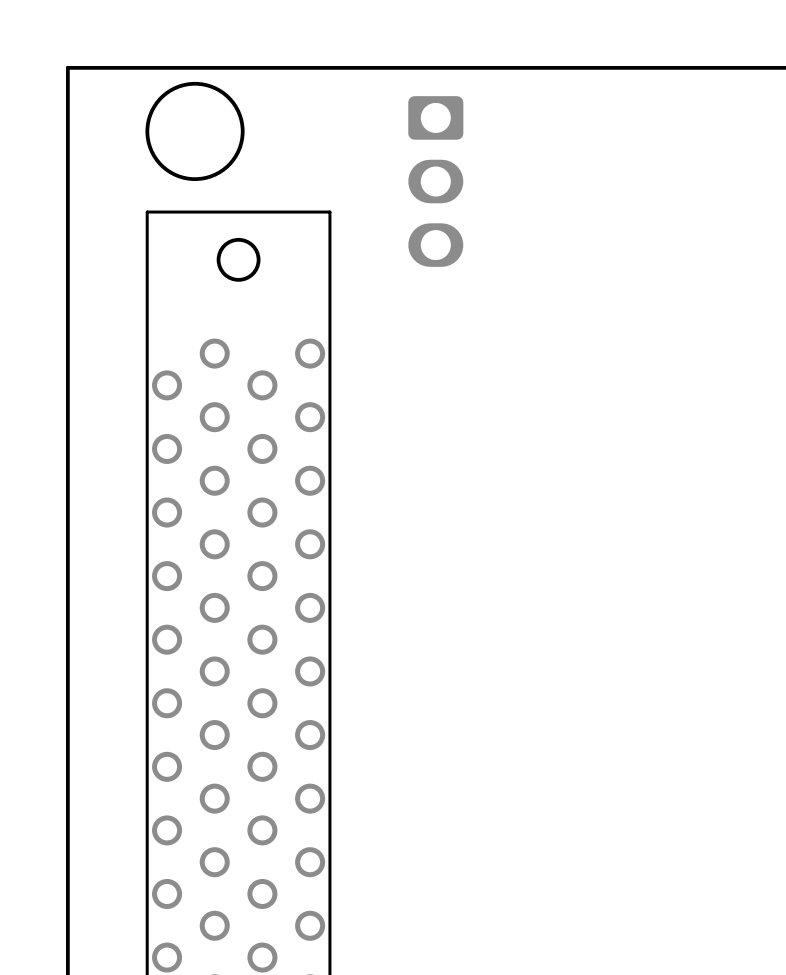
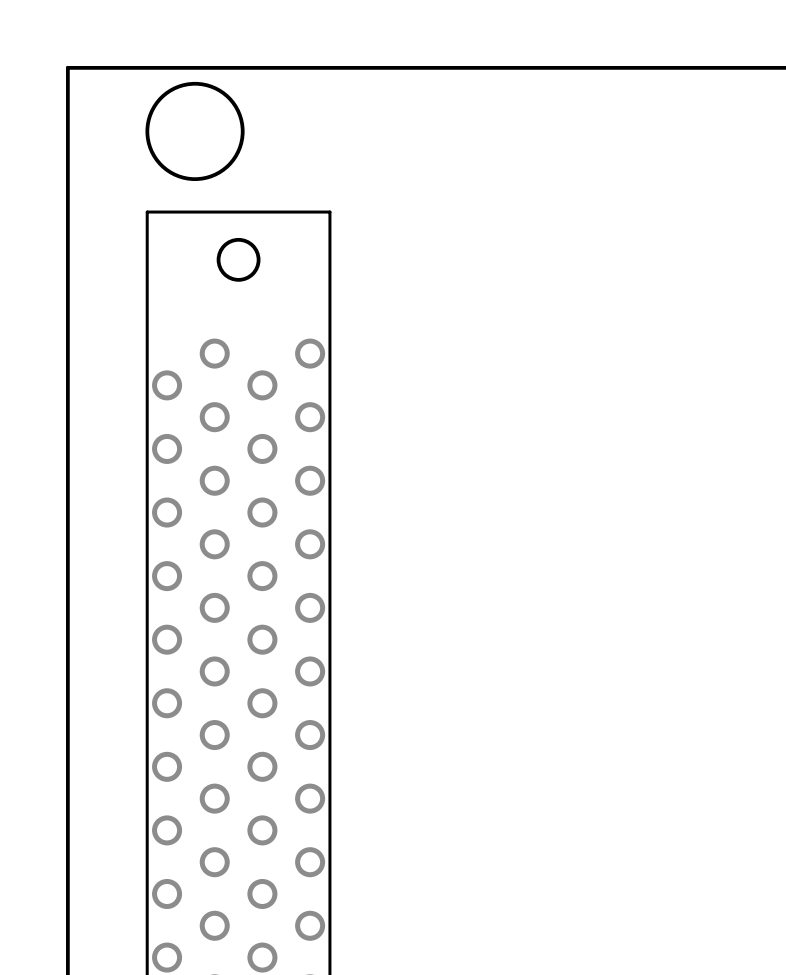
part: (435, 181) -> none

